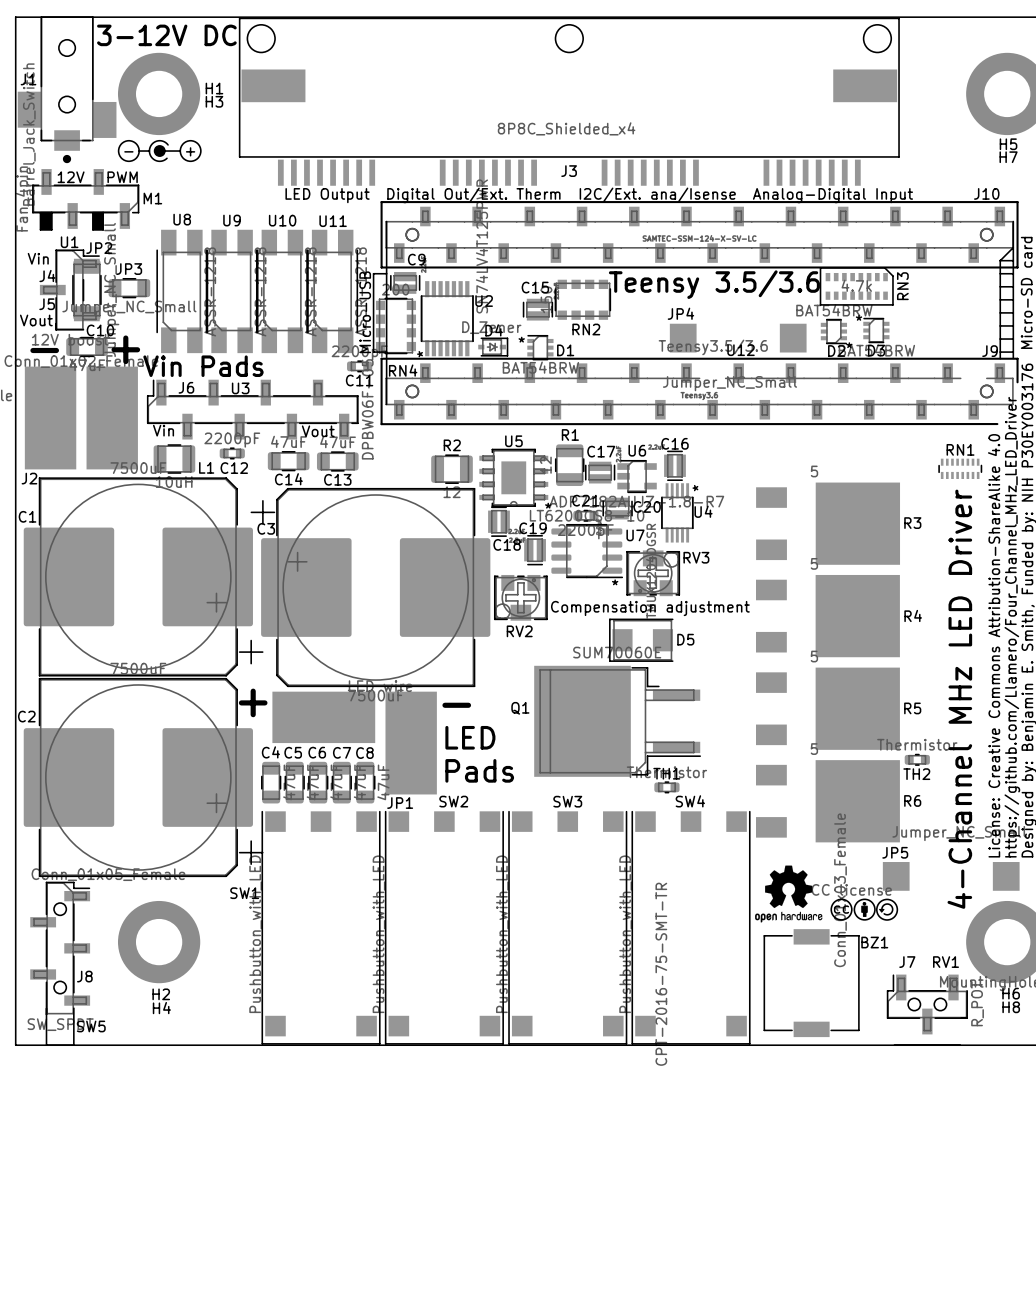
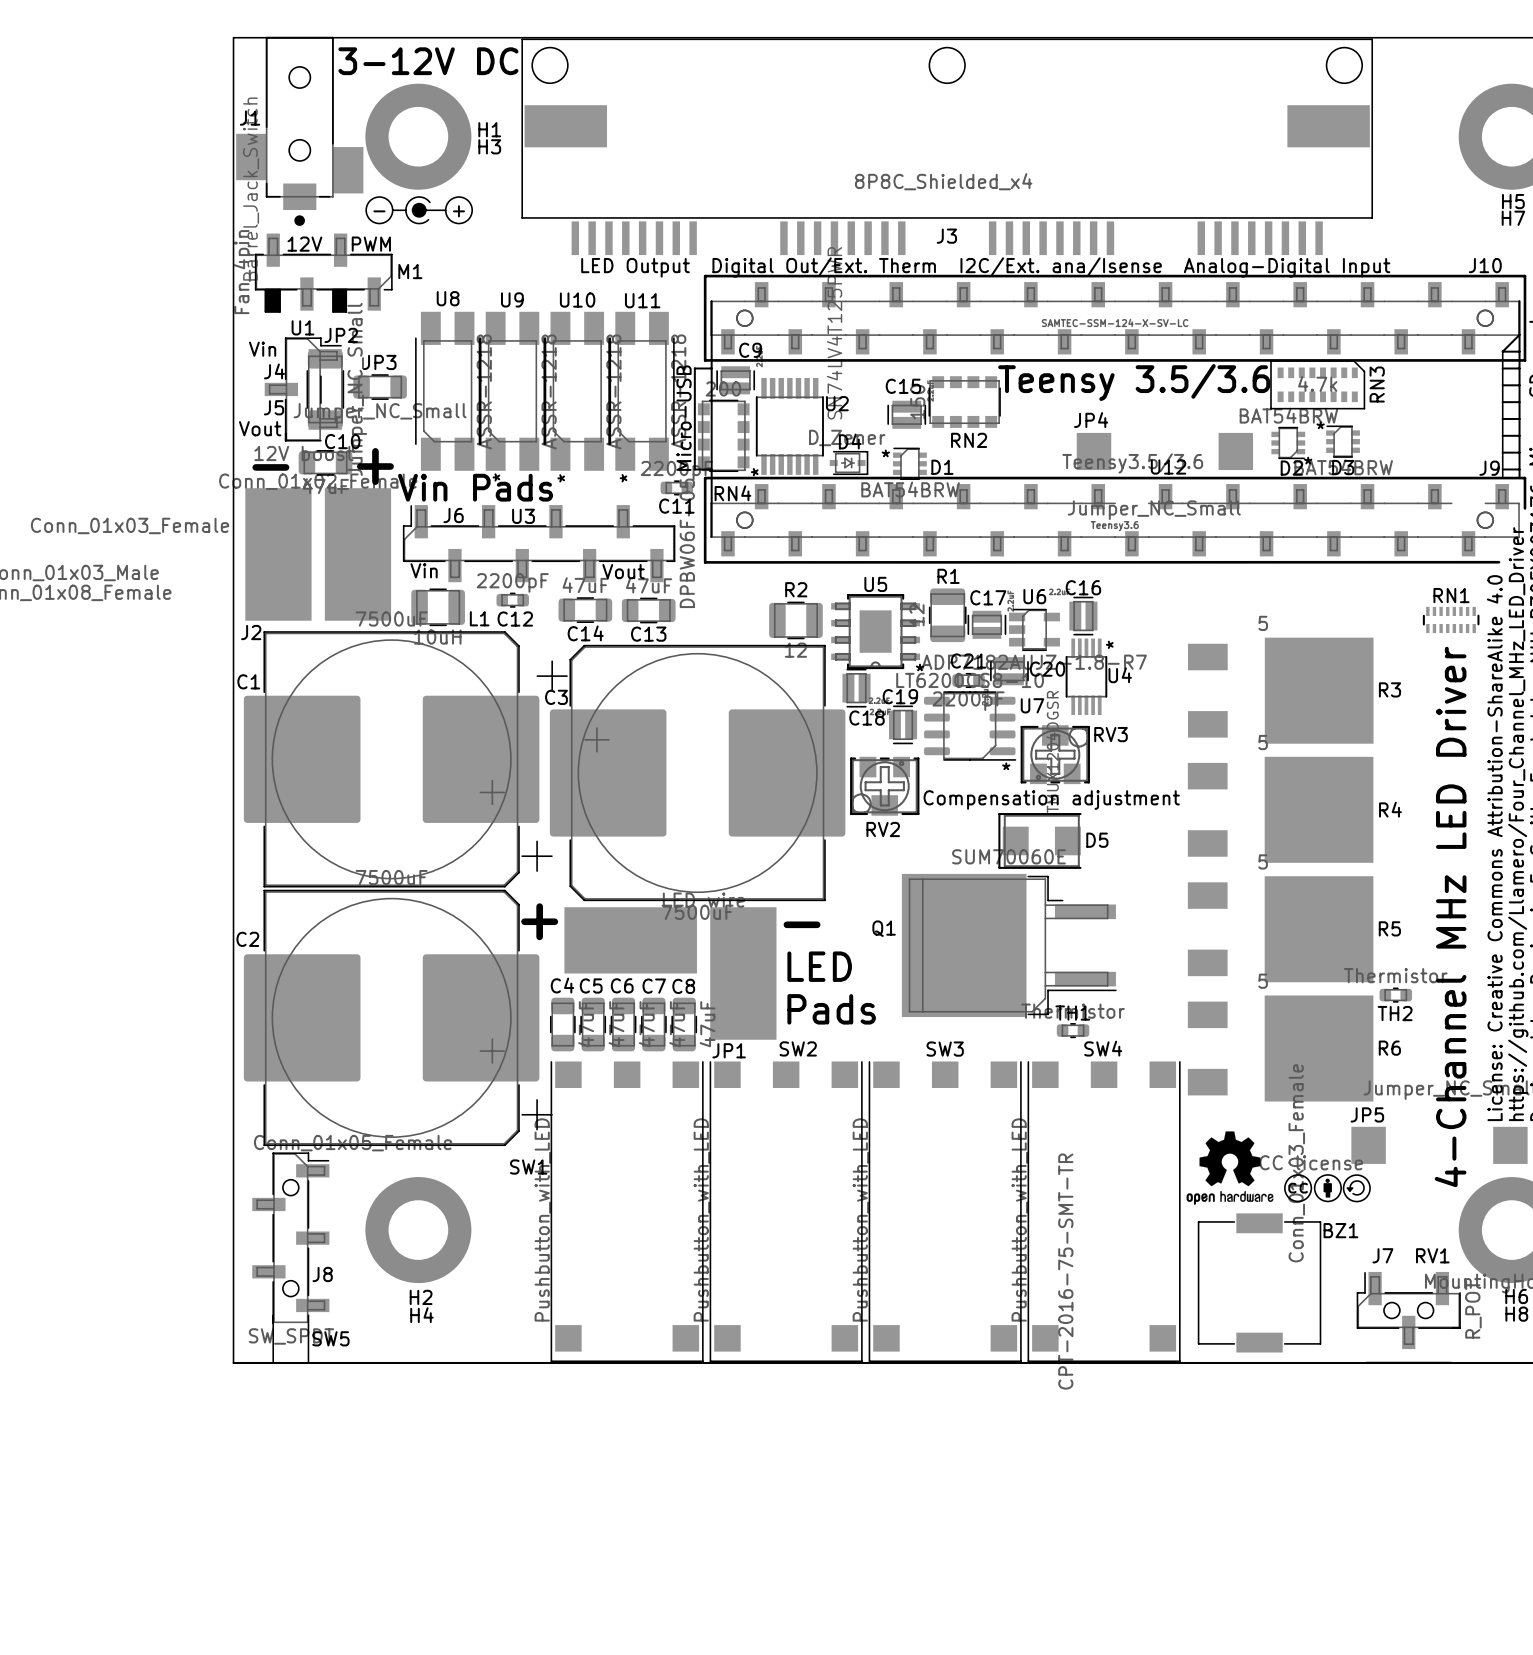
U9 text: none -> * (496, 477)
U10 text: none -> * (561, 478)
U11 text: none -> * (623, 478)

